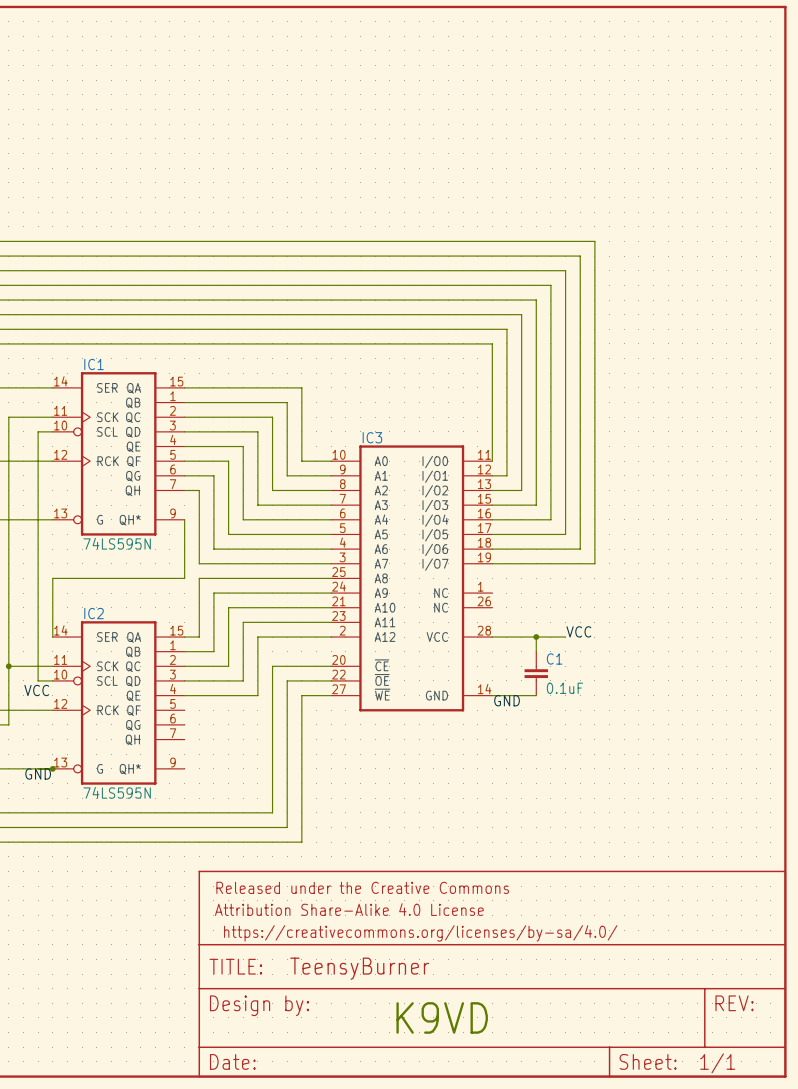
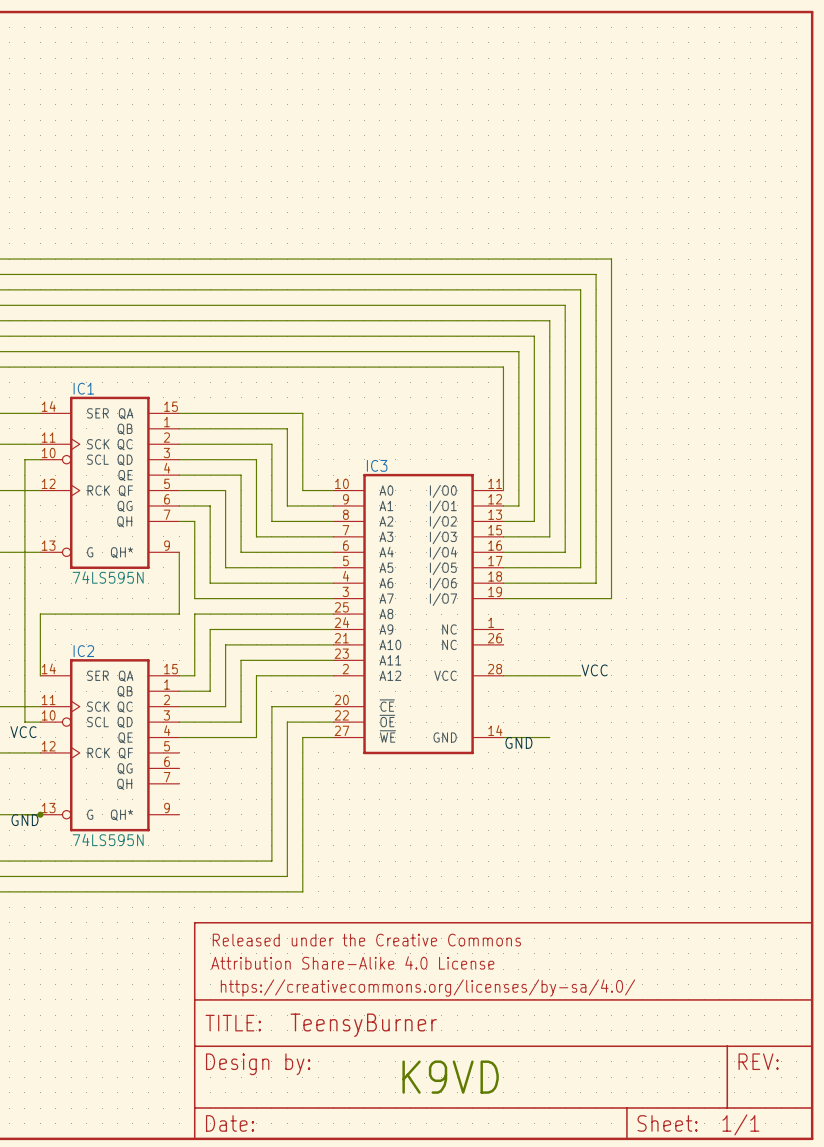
wire: (536, 637) (536, 651) -> none
junction: (536, 637) -> none
C1: 0.1uF (536, 673) -> none

